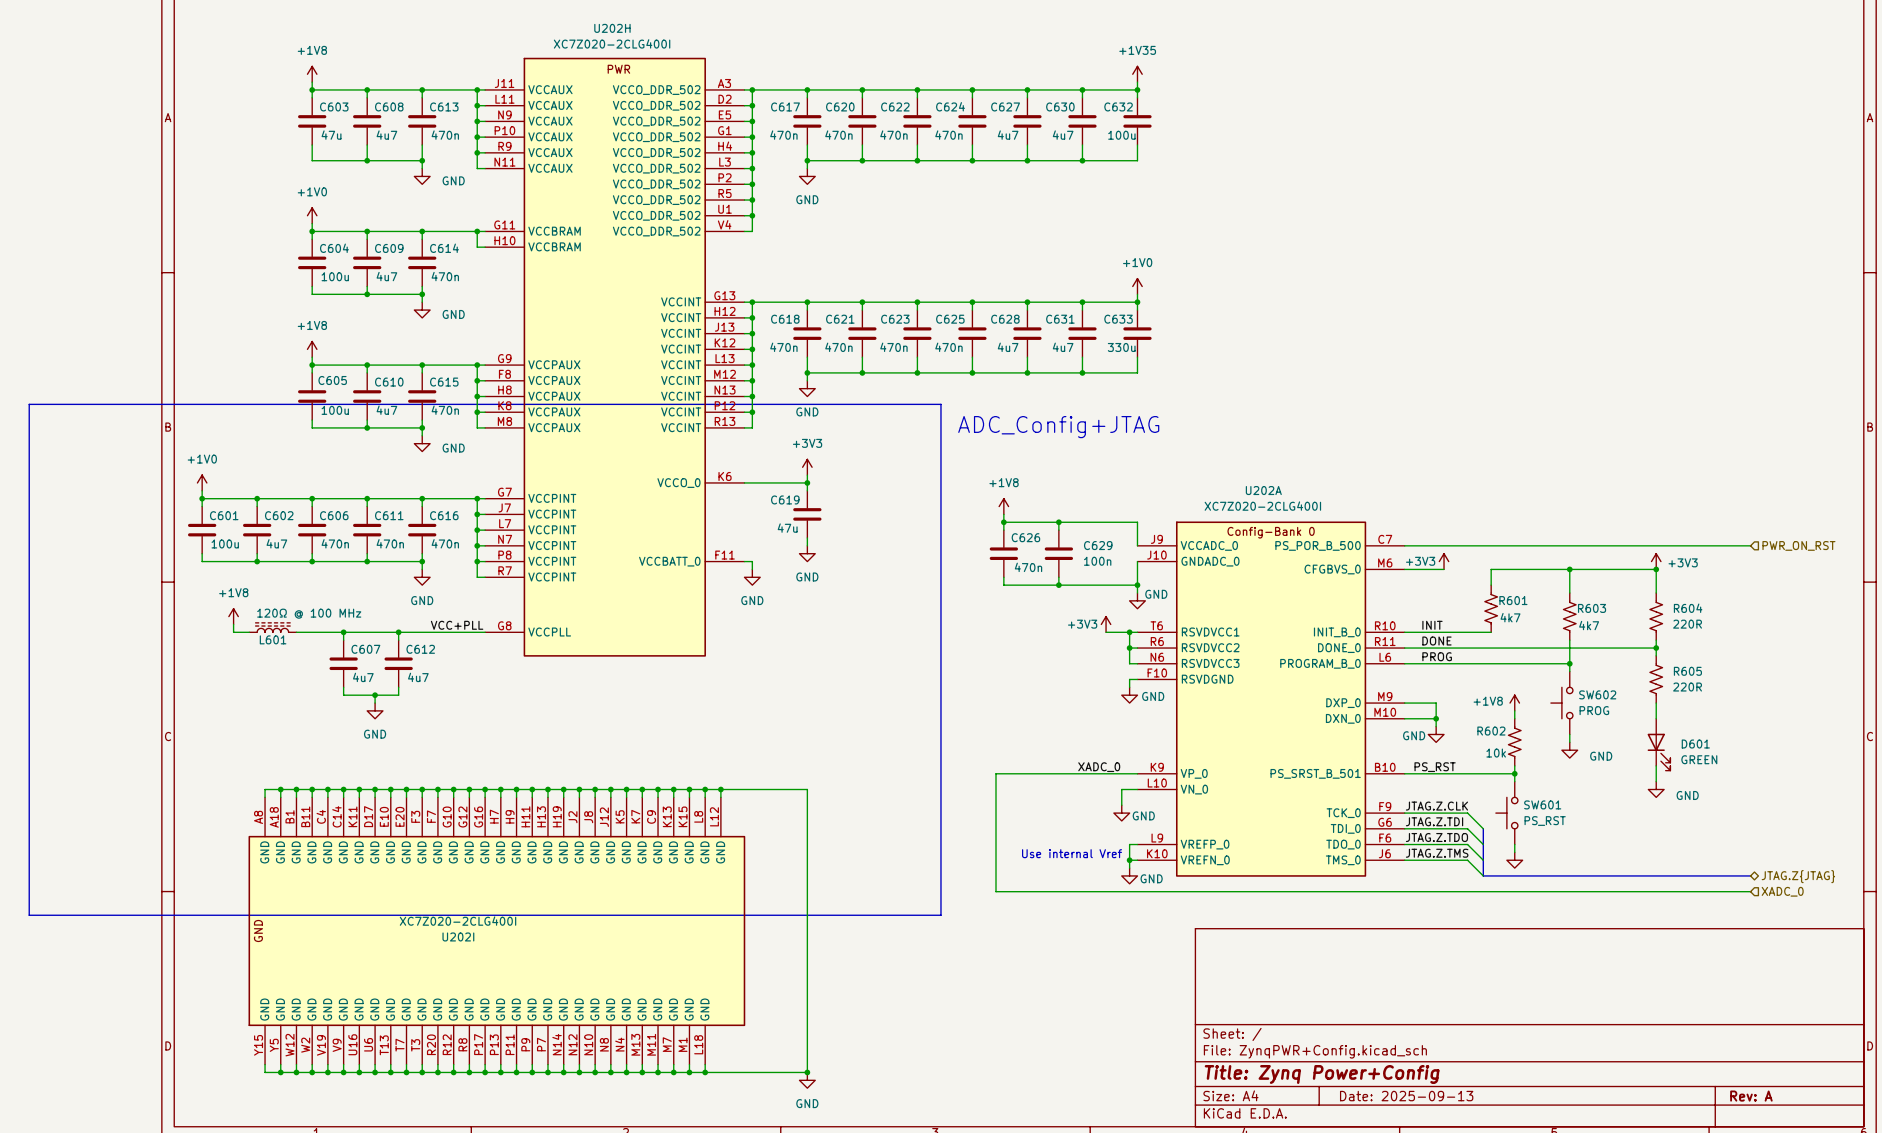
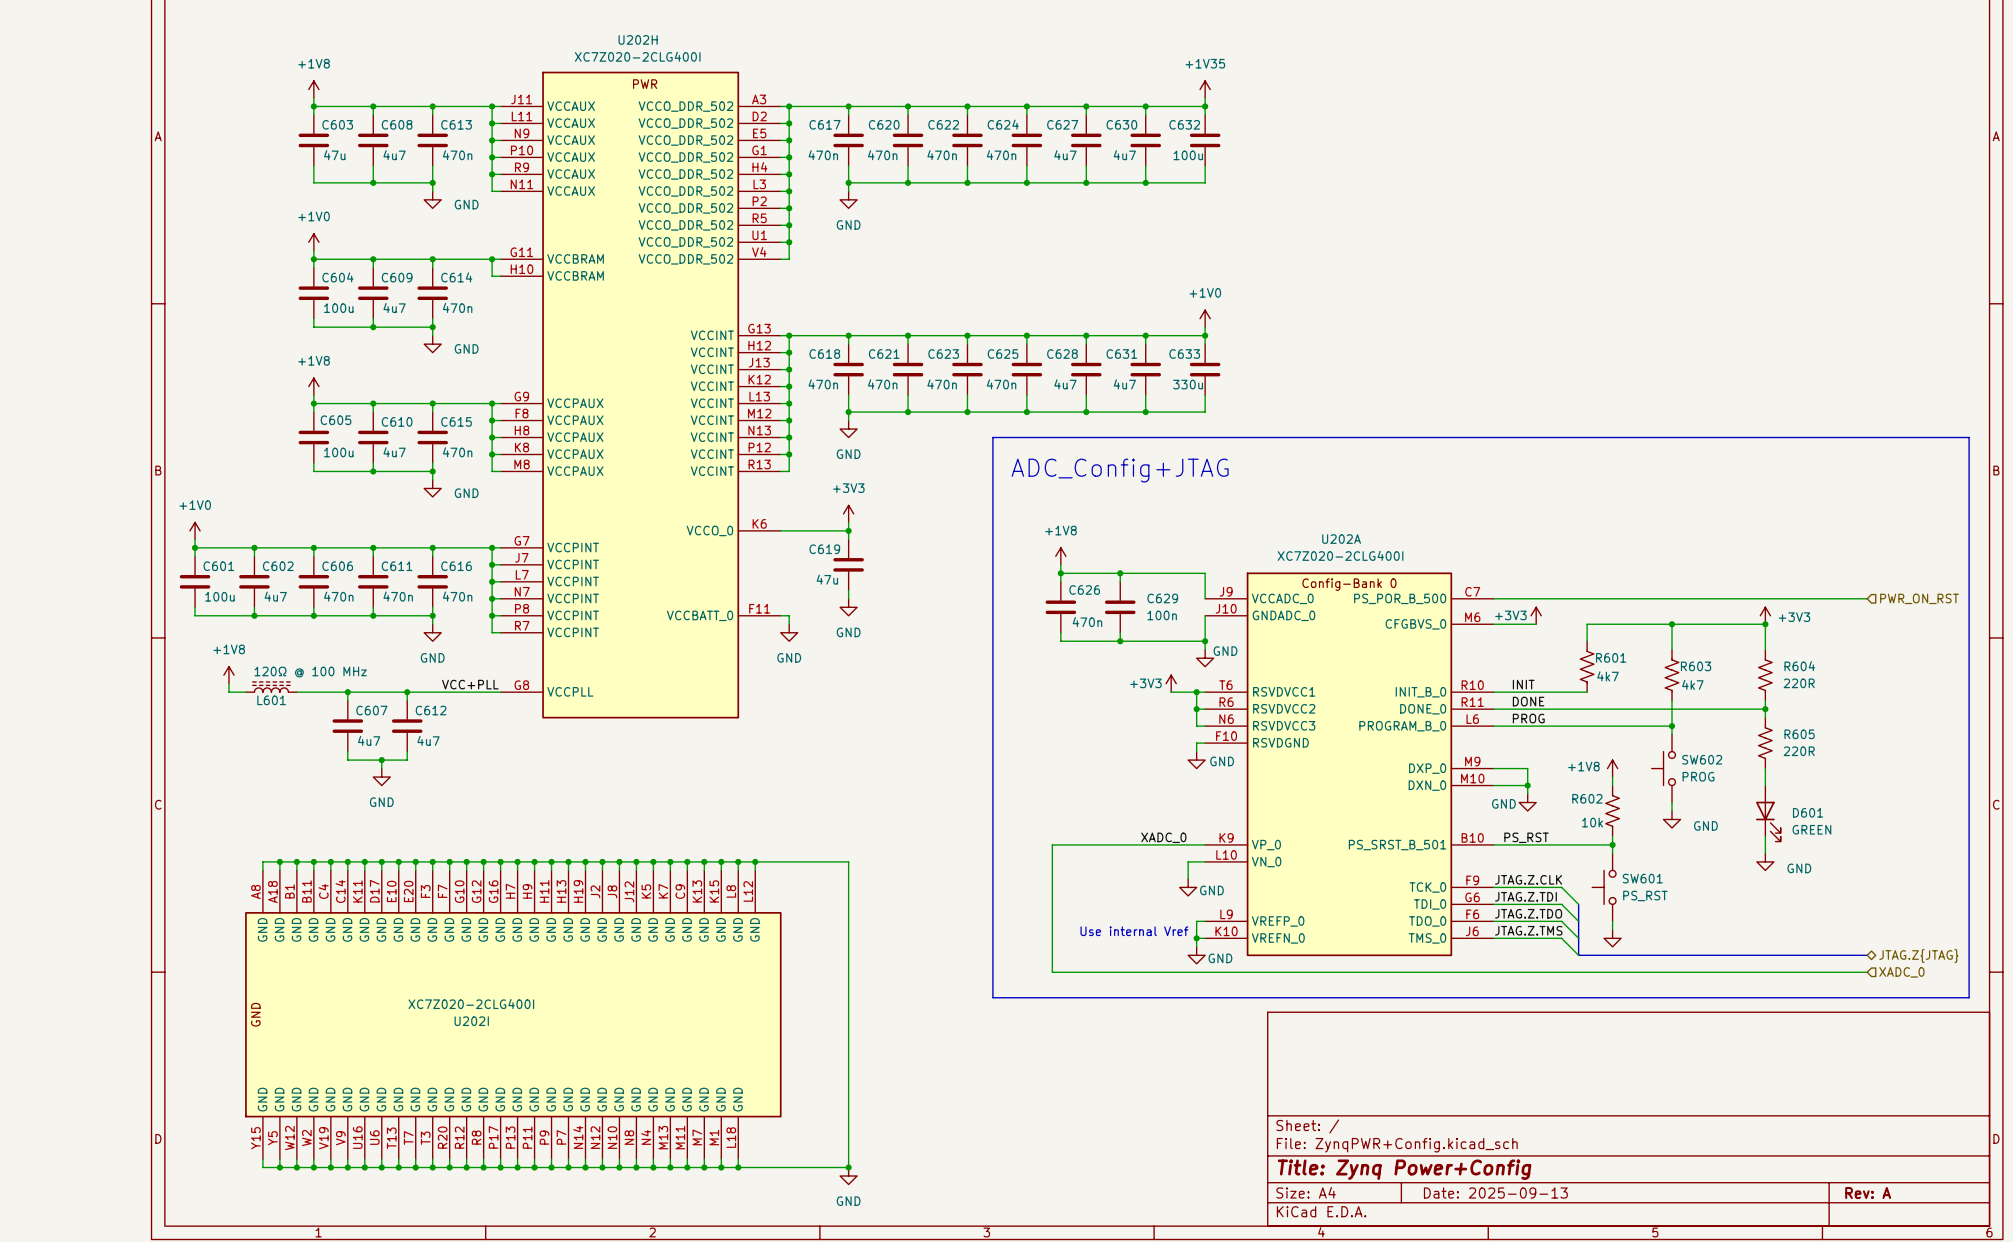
line: (940, 404) (29, 404) (29, 915) (940, 915) -> (992, 446) (992, 437) (1969, 437) (1969, 997) (992, 997)

